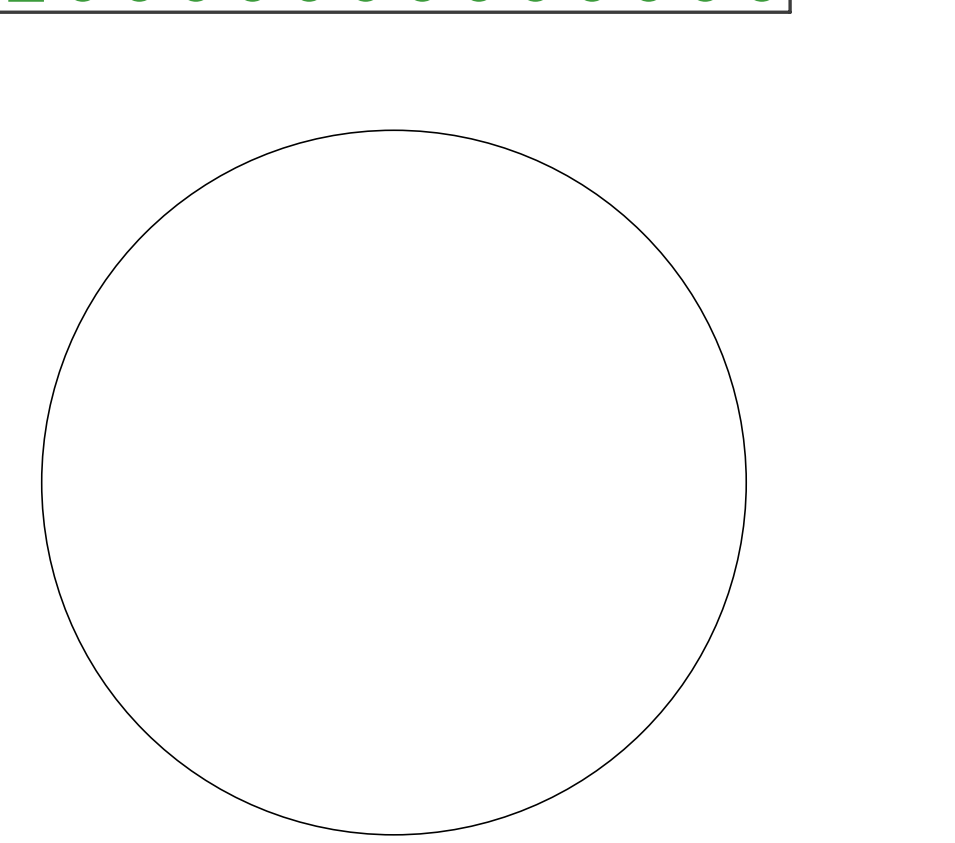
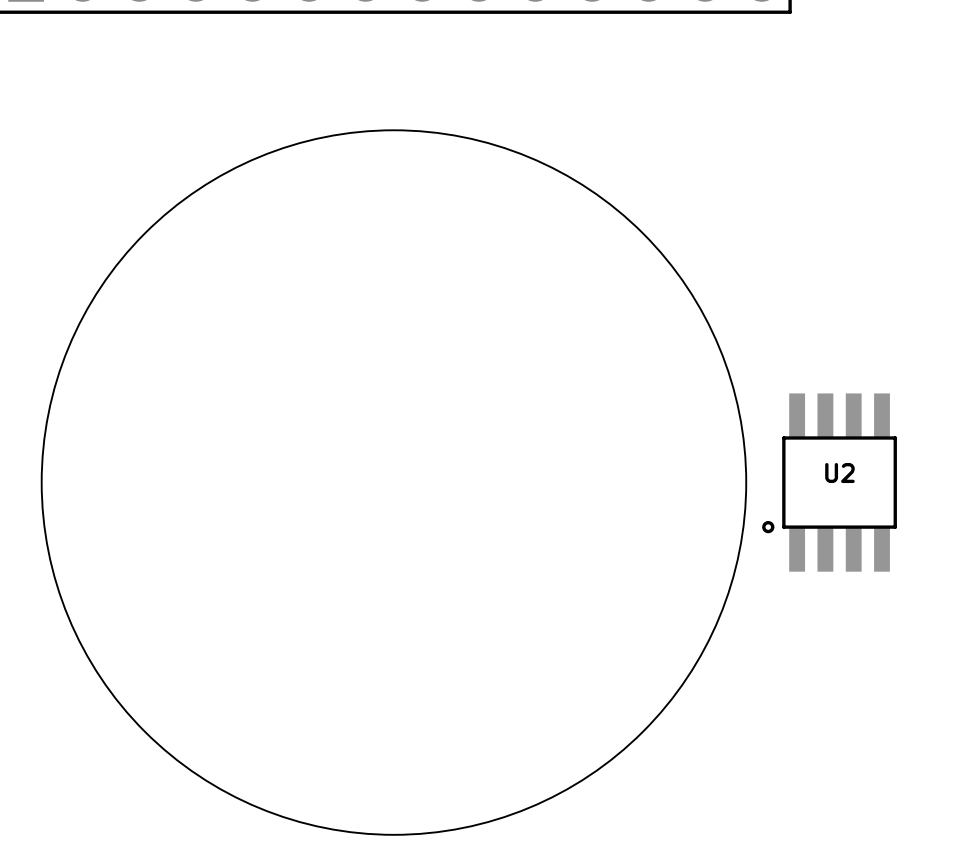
U2: none -> (829, 482)

